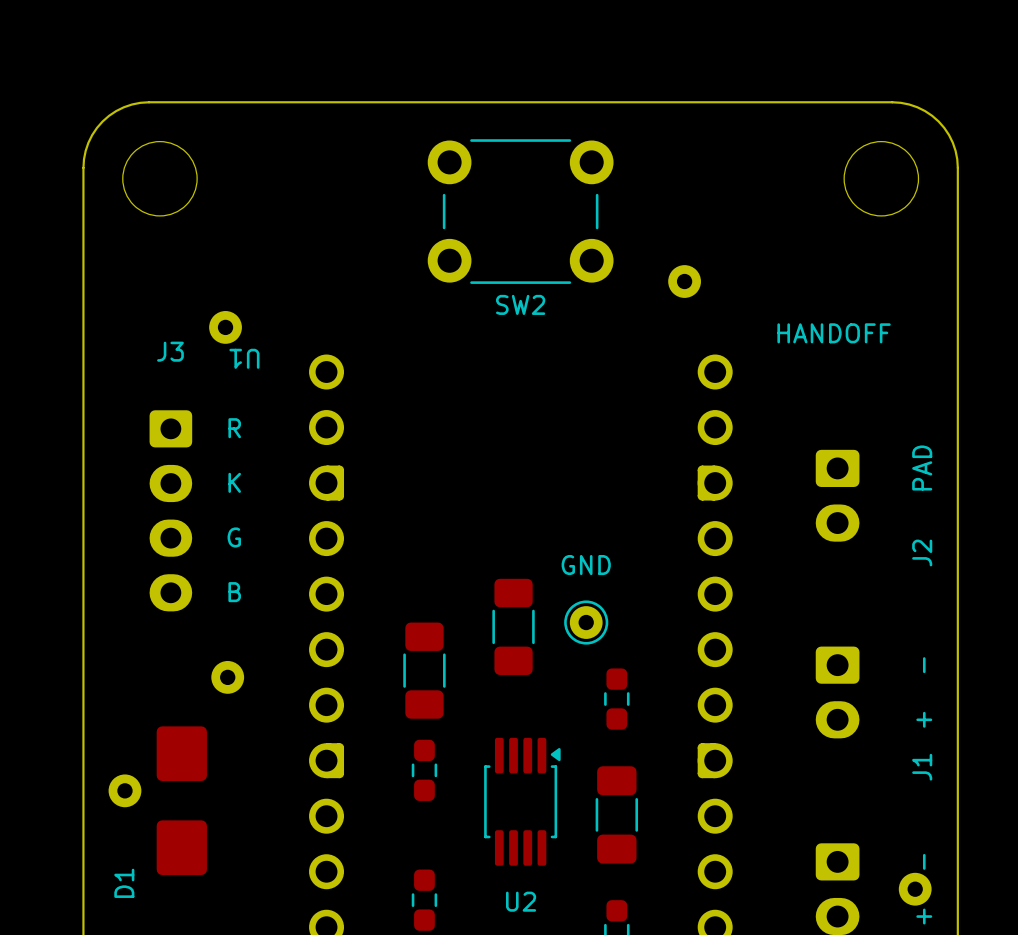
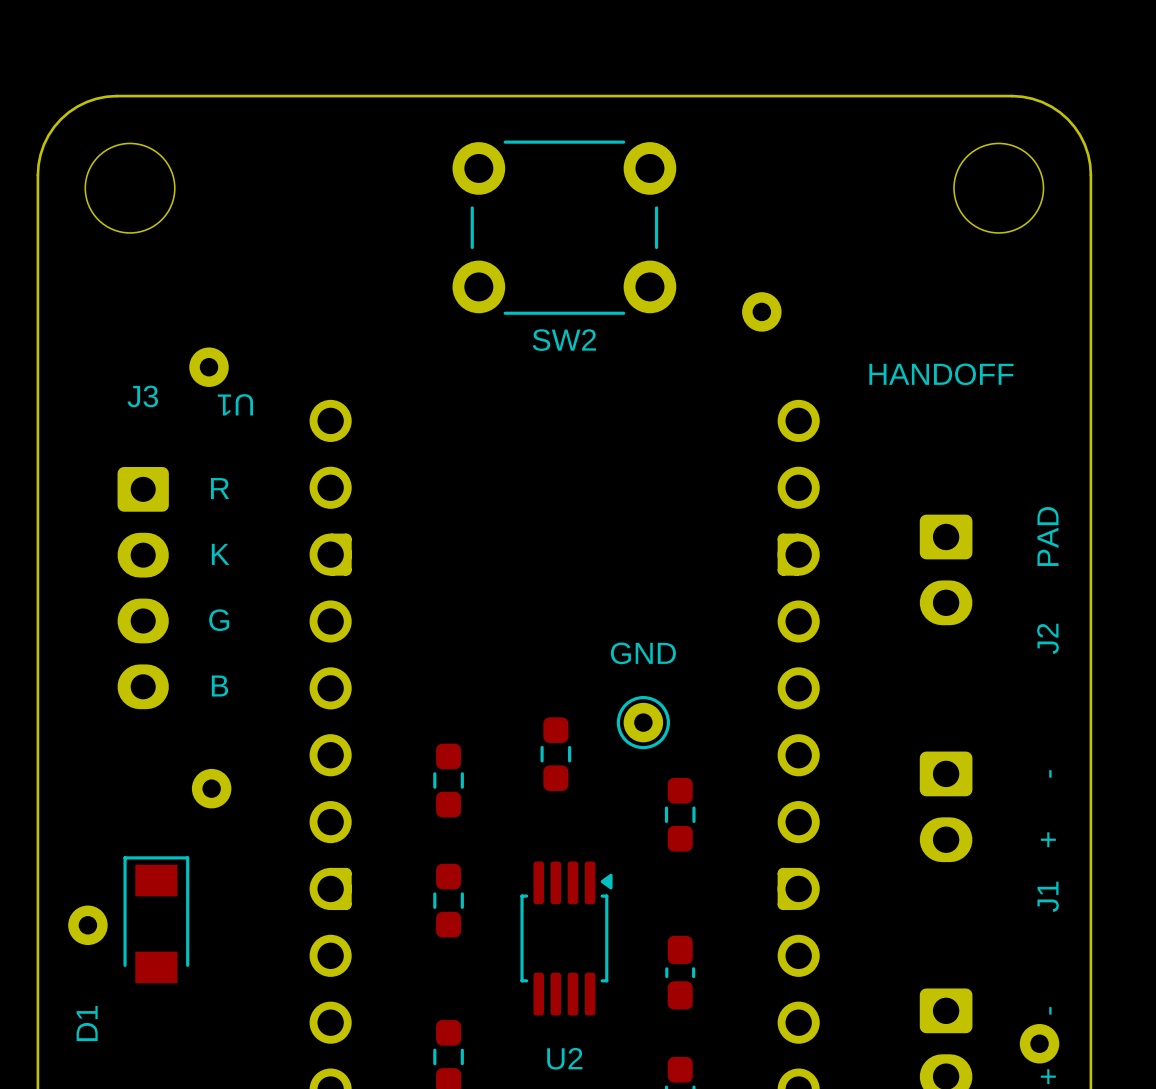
part footprint: [492, 578, 535, 675] -> [540, 717, 572, 792]
part footprint: [403, 622, 446, 719] -> [433, 743, 464, 818]
D1 footprint: [156, 726, 207, 876] -> [123, 856, 190, 984]
part footprint: [595, 766, 639, 864] -> [665, 935, 696, 1010]

